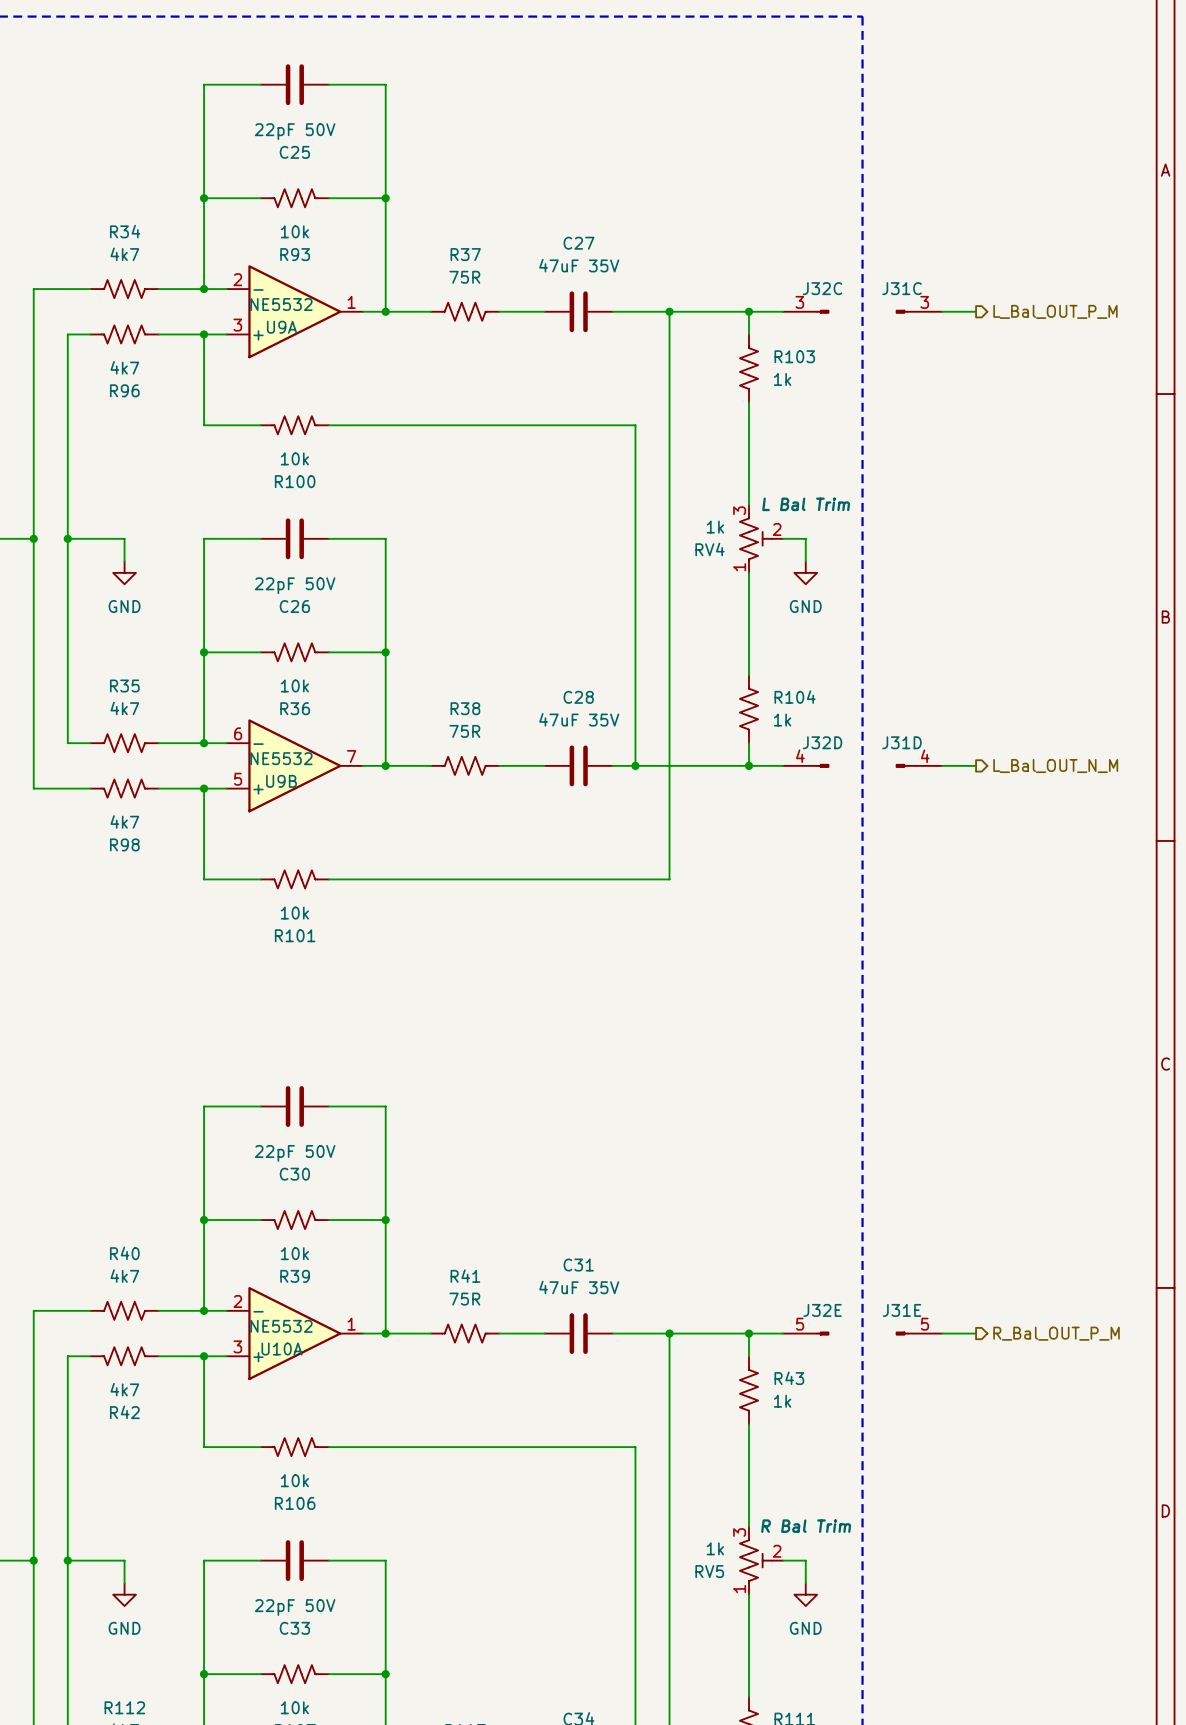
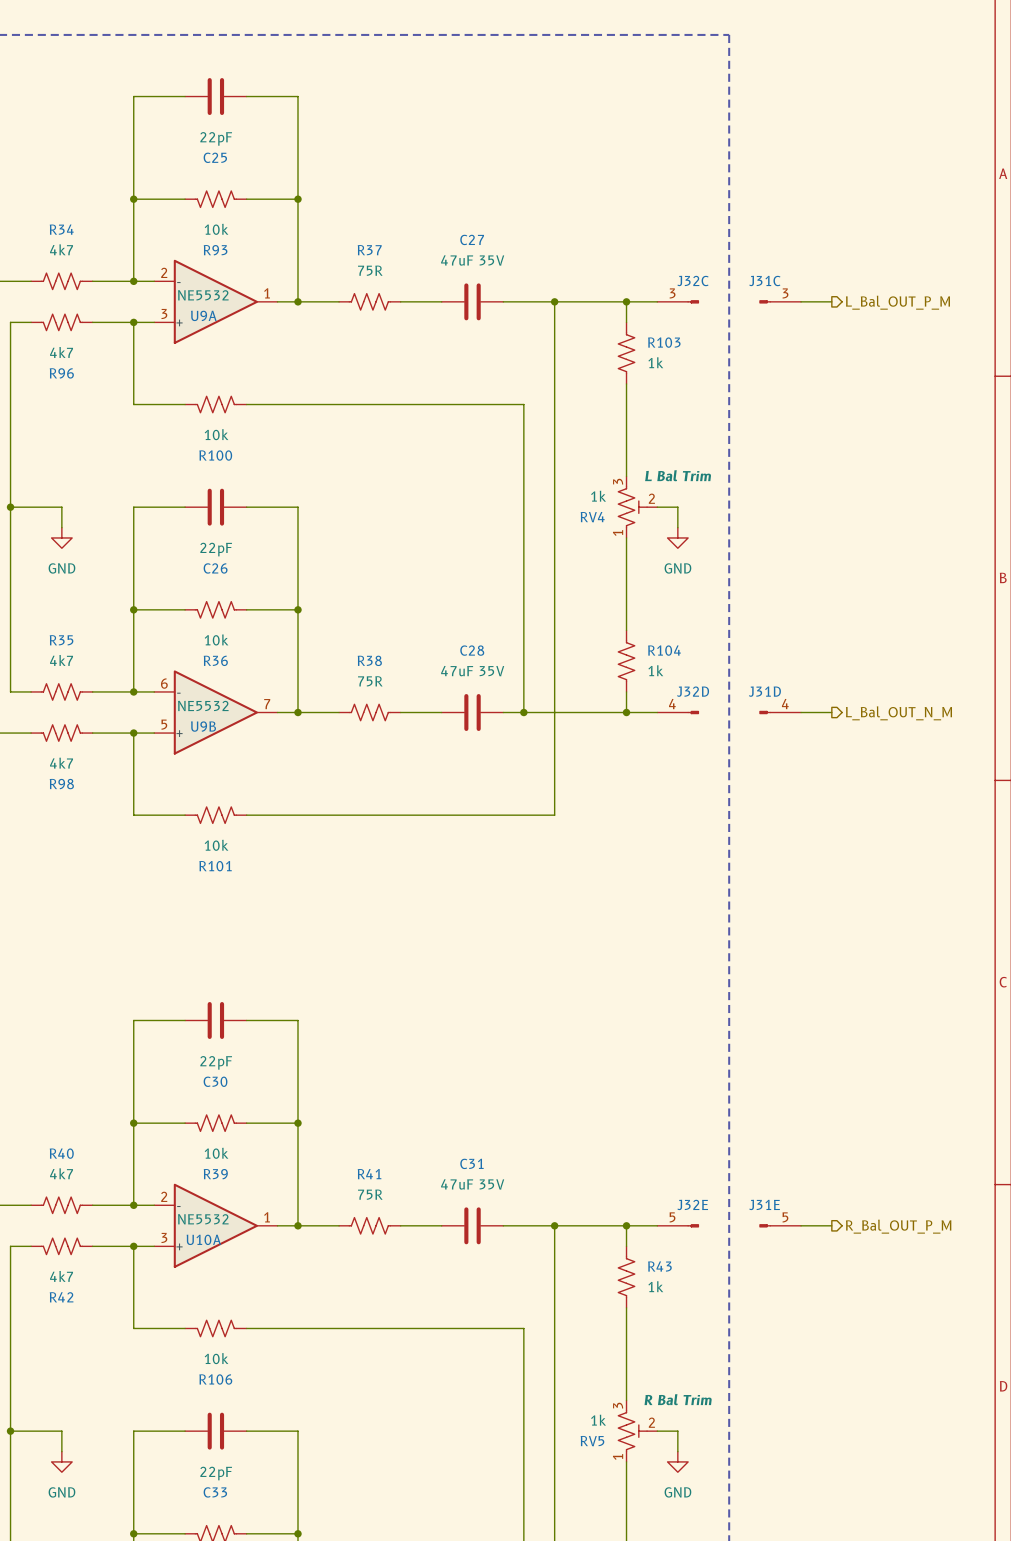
C25 value: 22pF 50V (295, 131) -> 22pF (216, 138)
C26 value: 22pF 50V (295, 585) -> 22pF (216, 549)
C30 value: 22pF 50V (295, 1153) -> 22pF (216, 1062)
C33 value: 22pF 50V (295, 1607) -> 22pF (216, 1473)

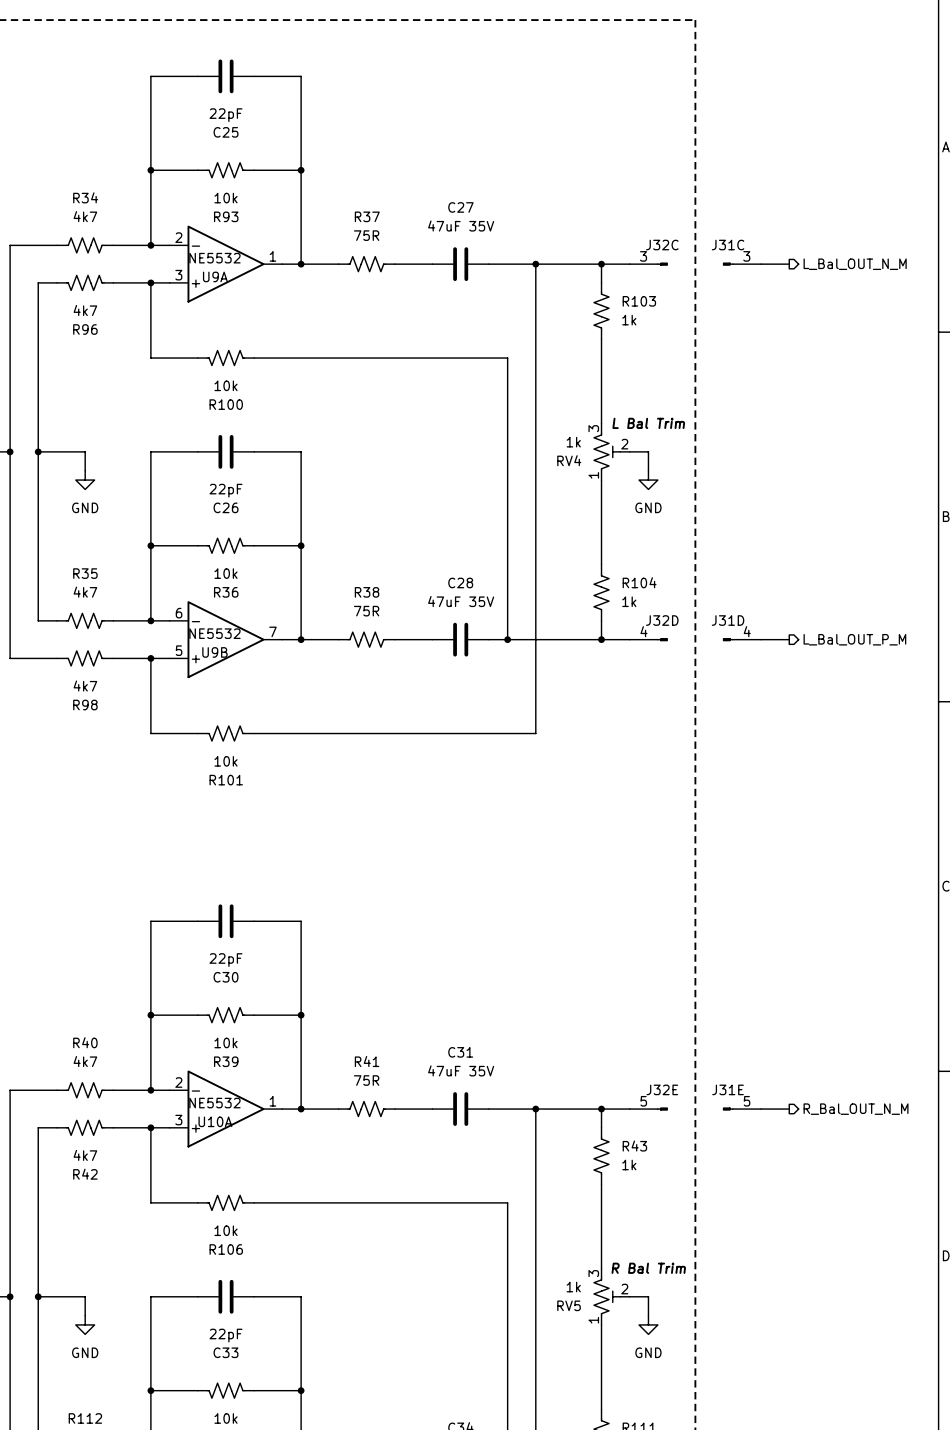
hierarchical label: L_Bal_OUT_P_M (897, 302) -> L_Bal_OUT_N_M (855, 264)
hierarchical label: L_Bal_OUT_N_M (898, 713) -> L_Bal_OUT_P_M (854, 639)
hierarchical label: R_Bal_OUT_P_M (898, 1226) -> R_Bal_OUT_N_M (856, 1109)

